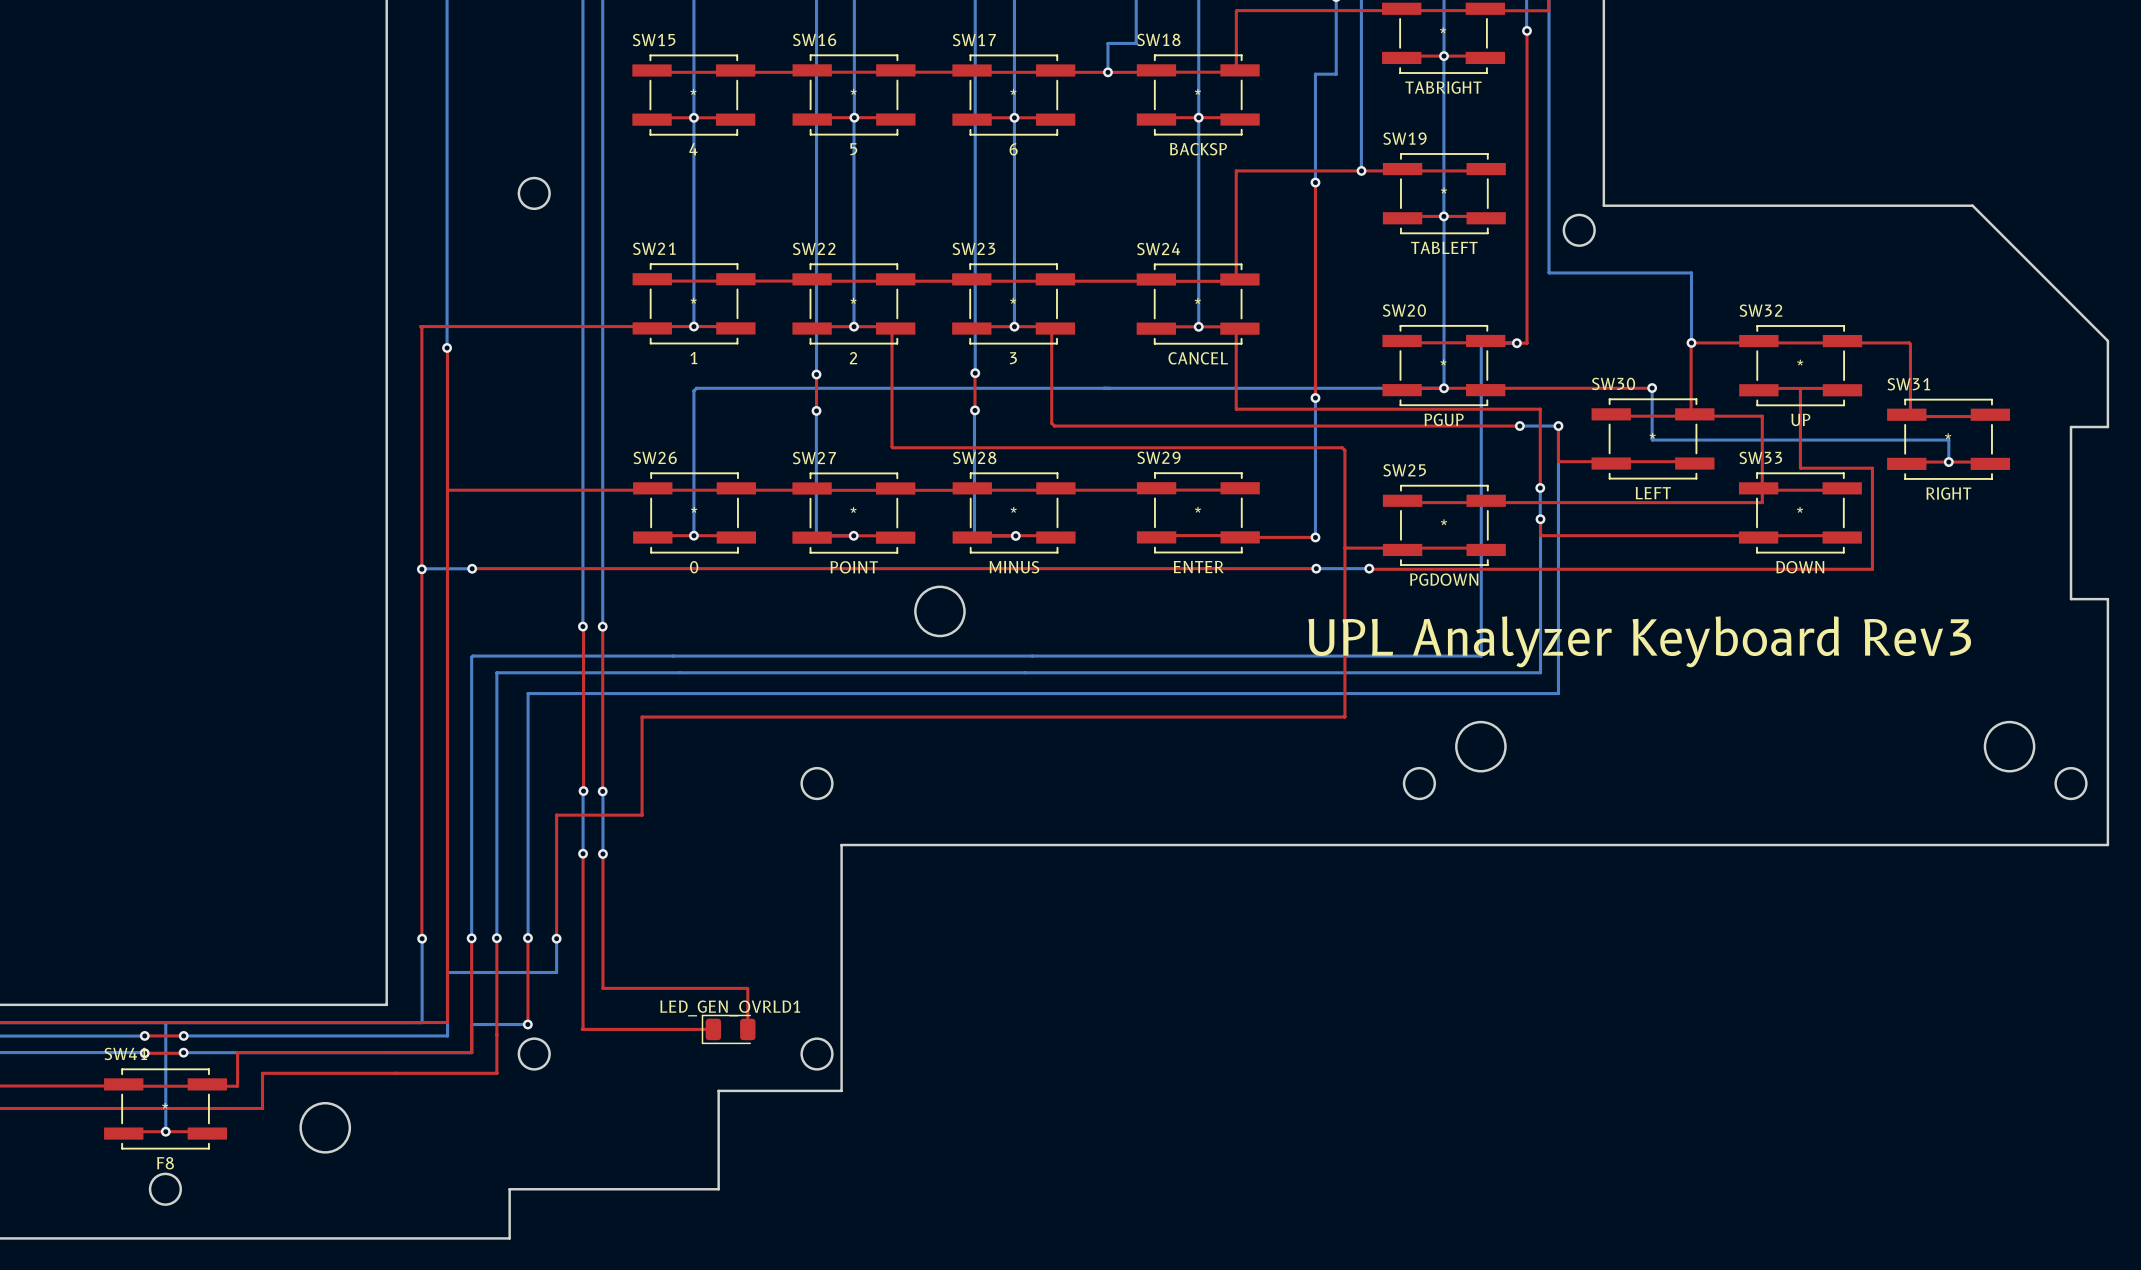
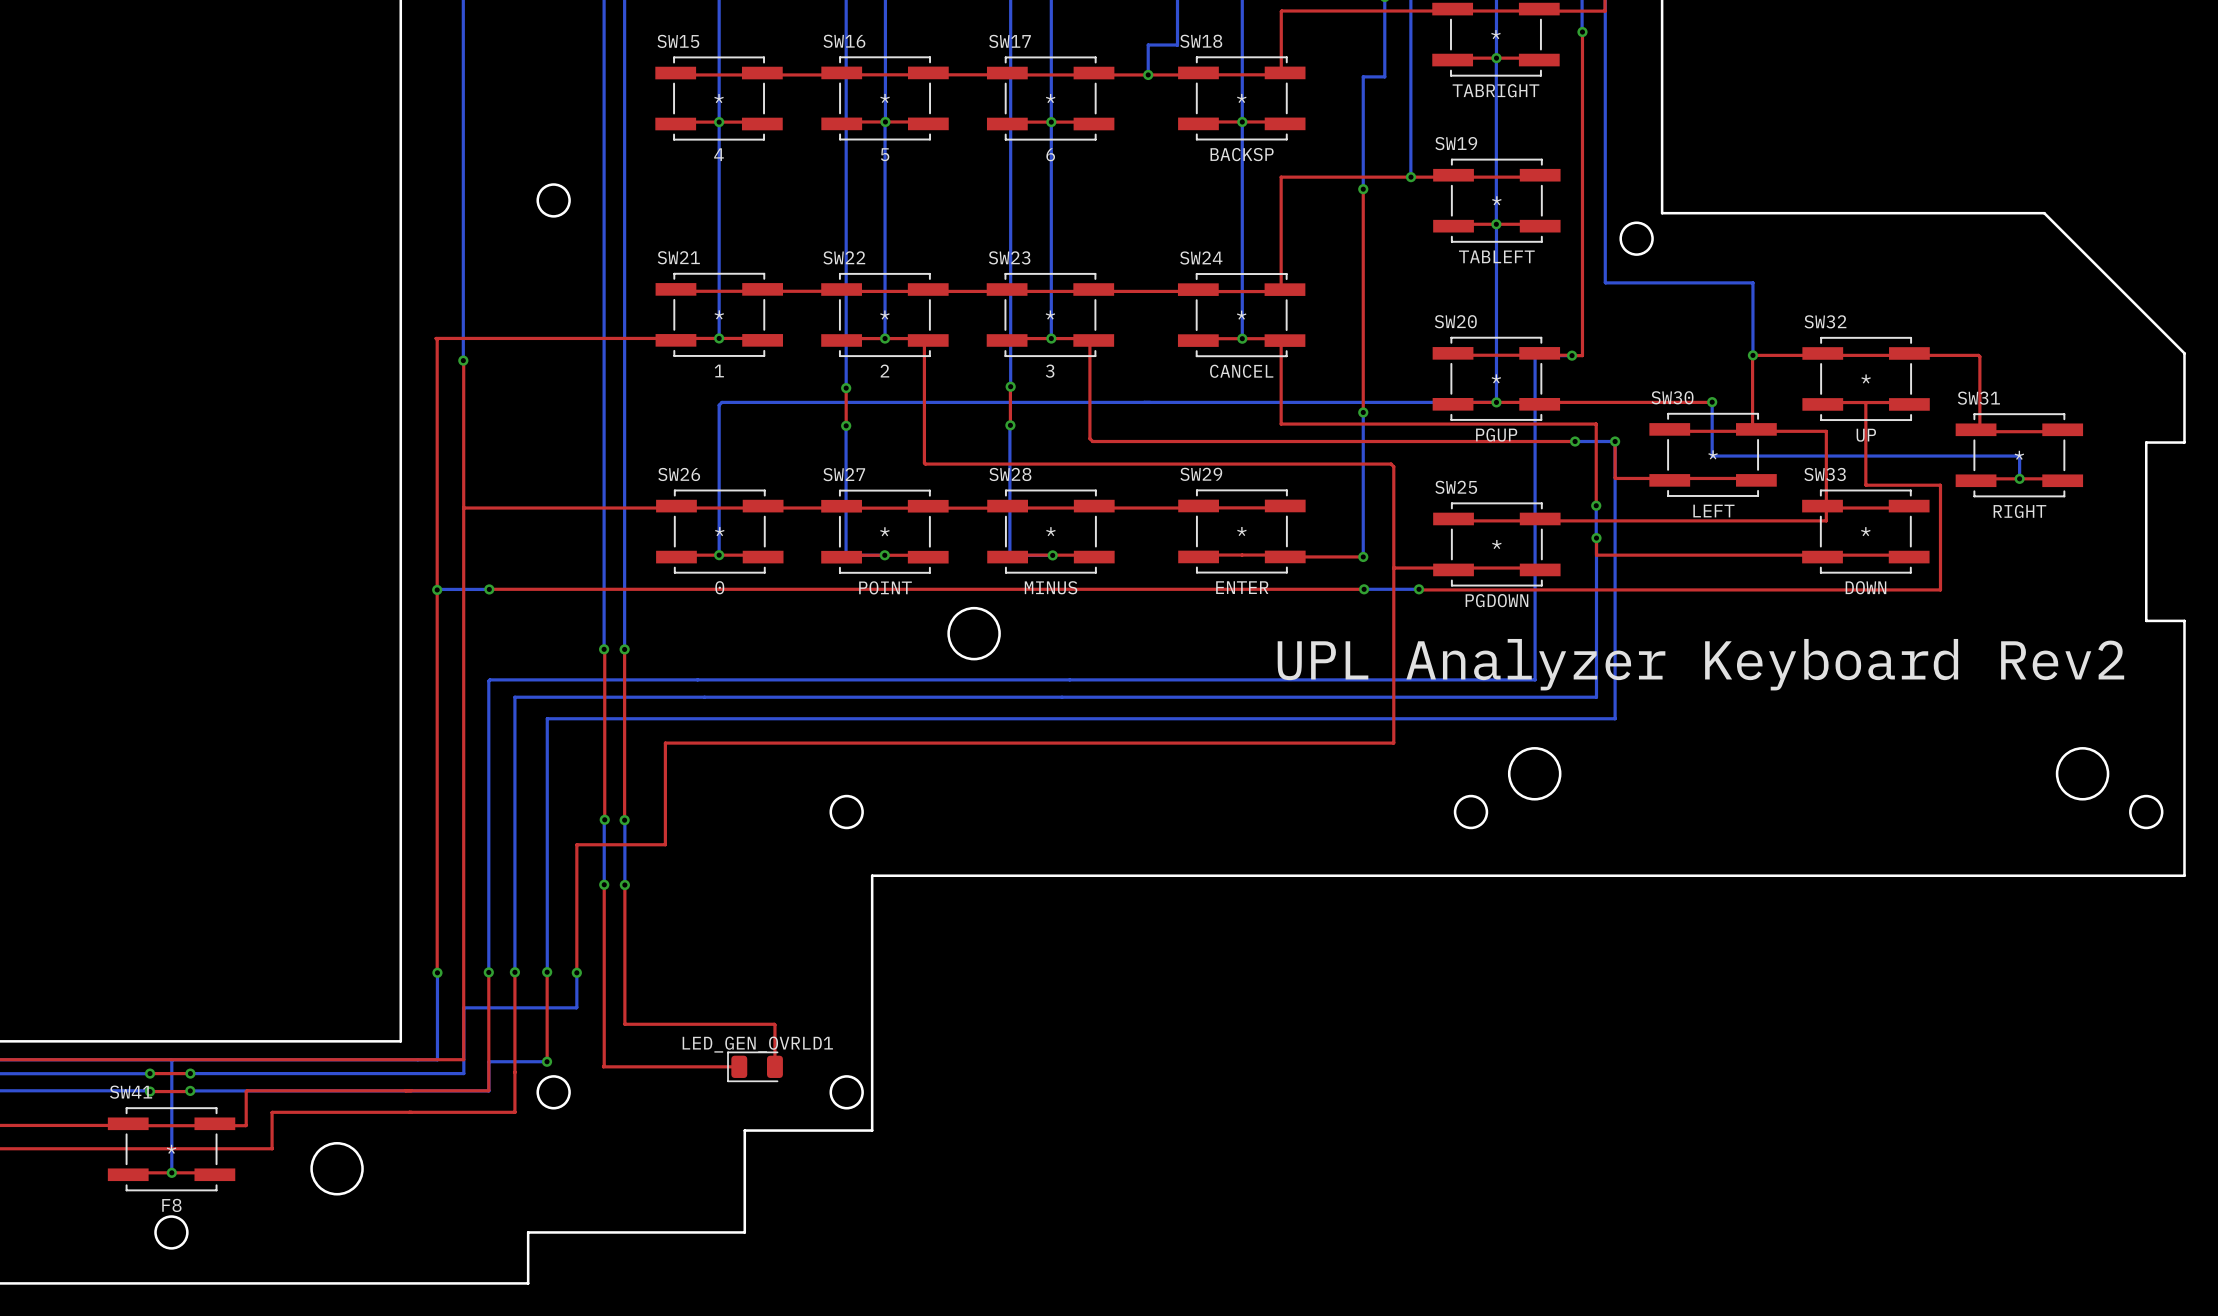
text: UPL Analyzer Keyboard Rev3 (1639, 641) -> UPL Analyzer Keyboard Rev2 (1700, 664)

